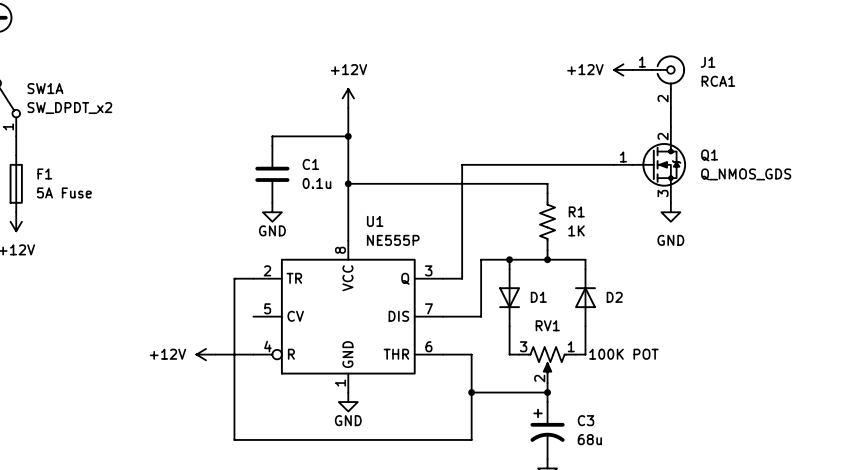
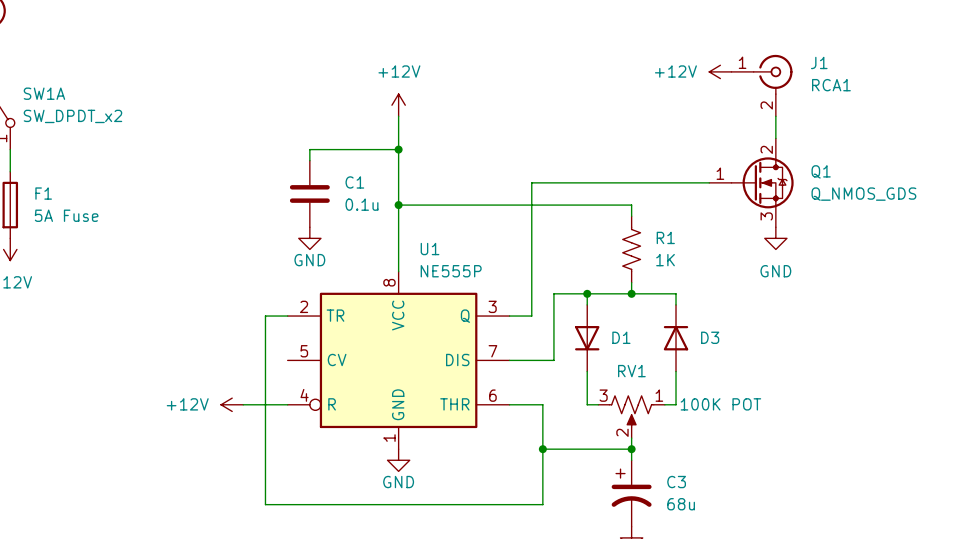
D2 name: D2 (614, 297) -> D3 (710, 337)

